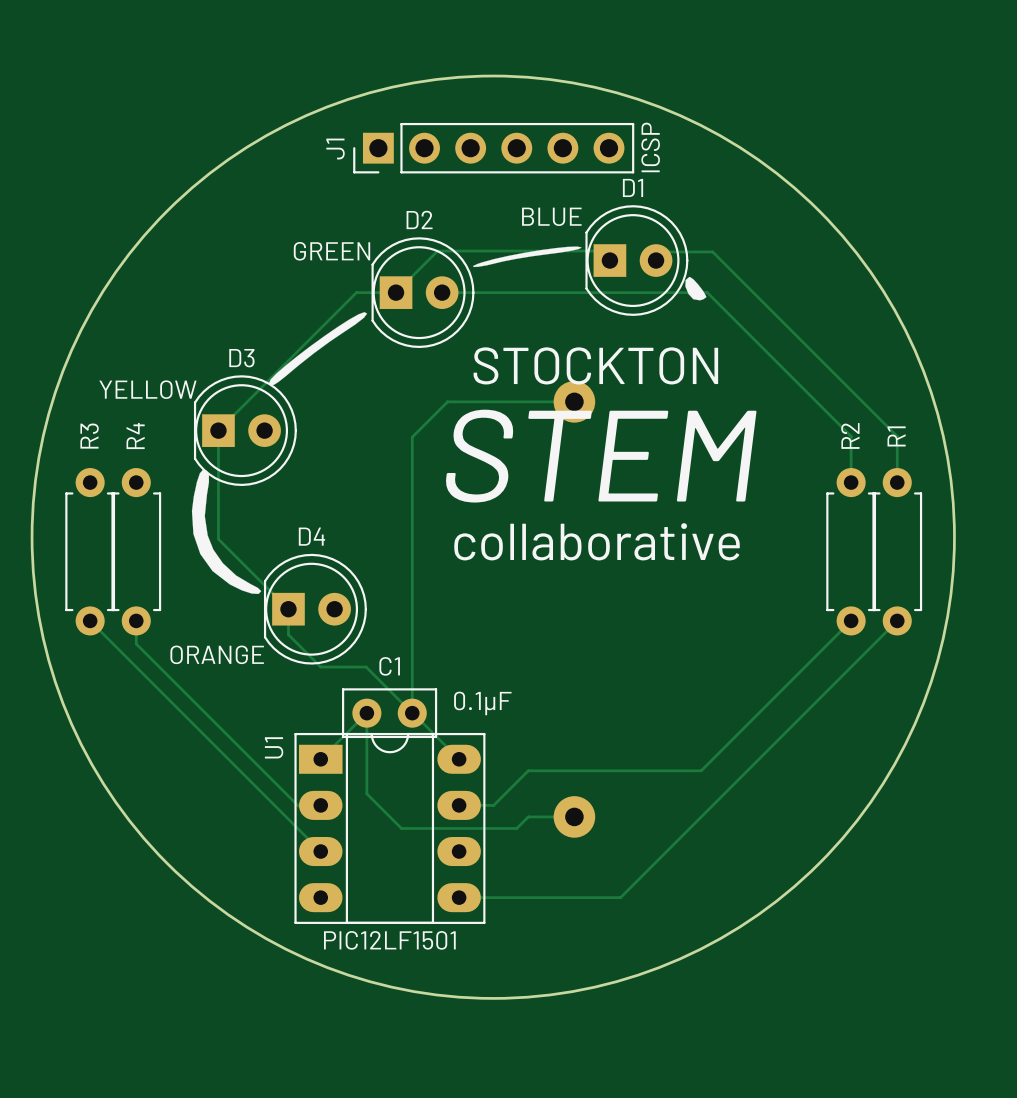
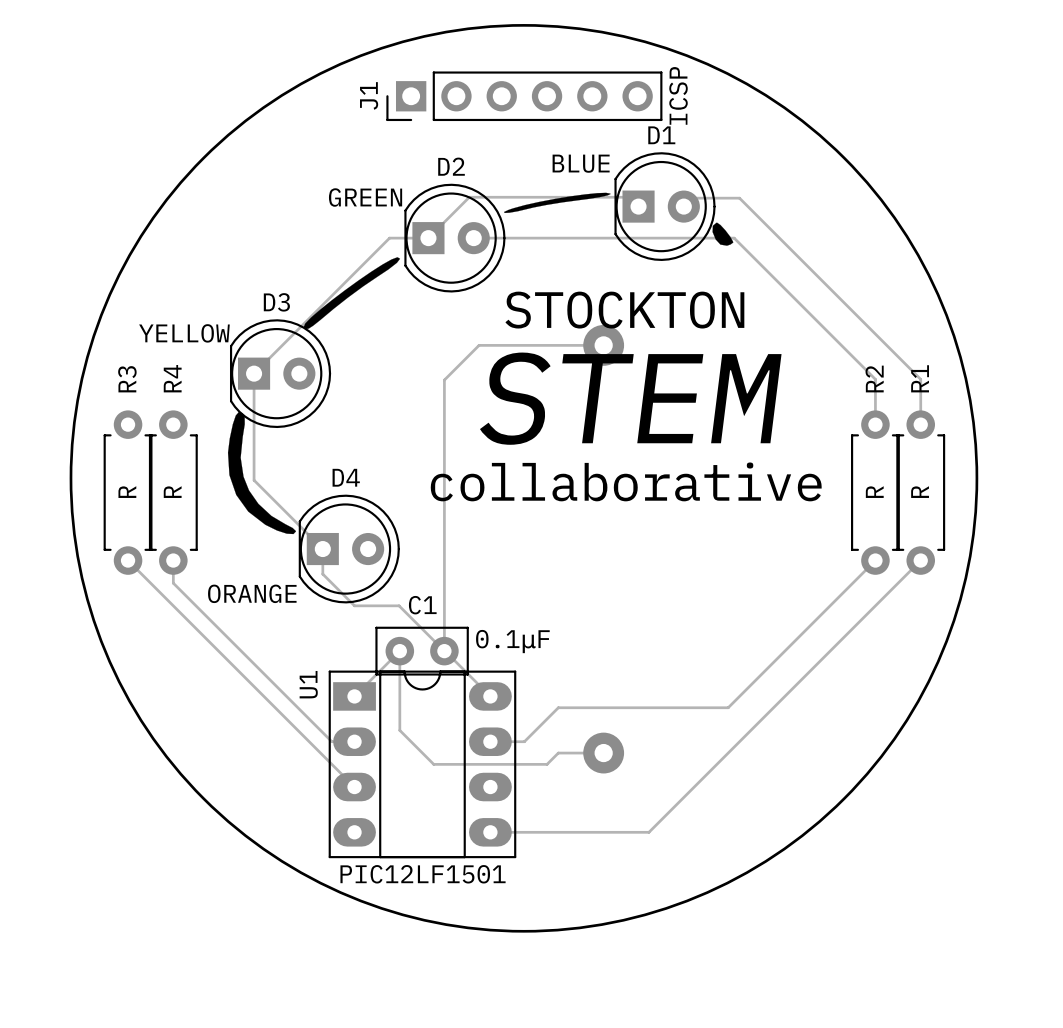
R3 value: none -> R (127, 492)
R4 value: none -> R (172, 492)
R2 value: none -> R (874, 492)
R1 value: none -> R (920, 492)

